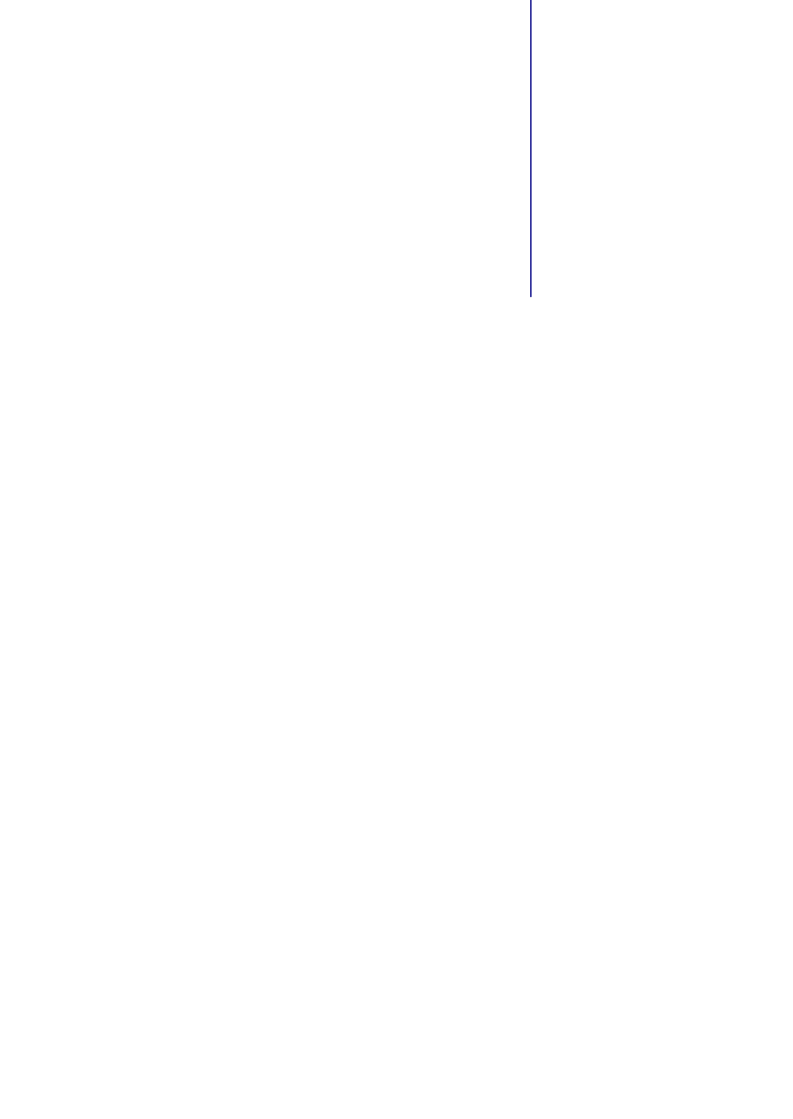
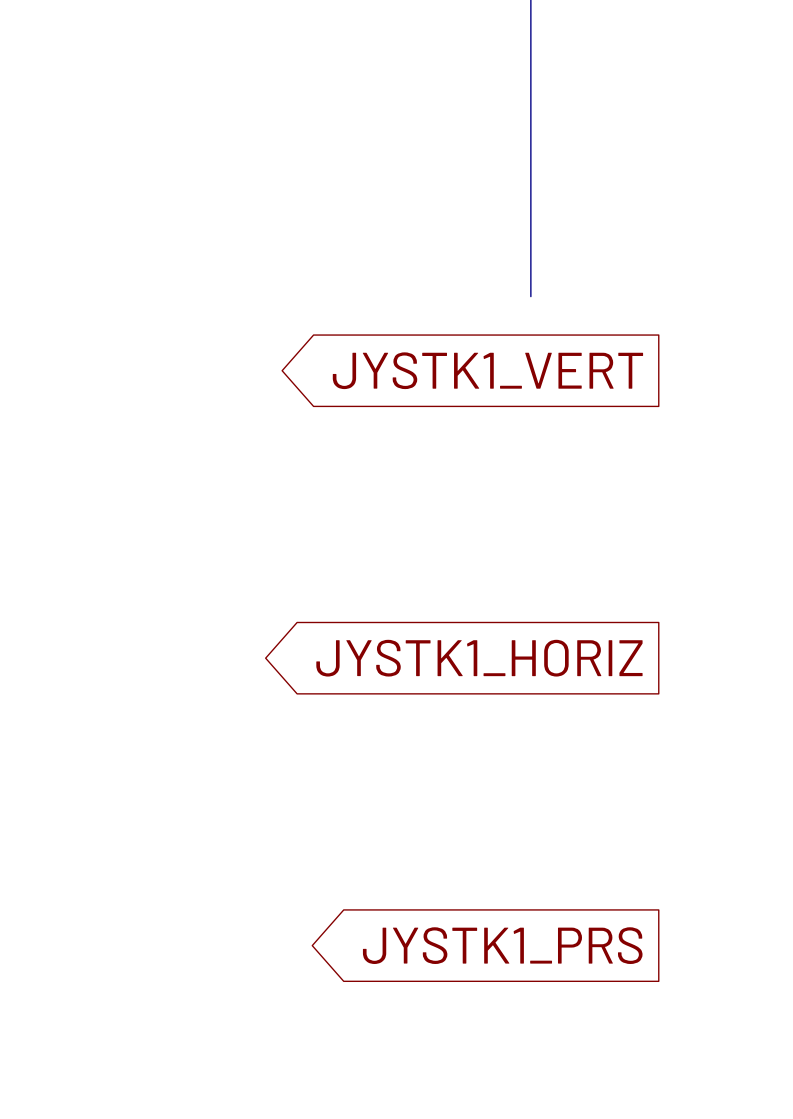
global label: none -> JYSTK1_VERT (487, 370)
global label: none -> JYSTK1_HORIZ (479, 658)
global label: none -> JYSTK1_PRS (502, 945)

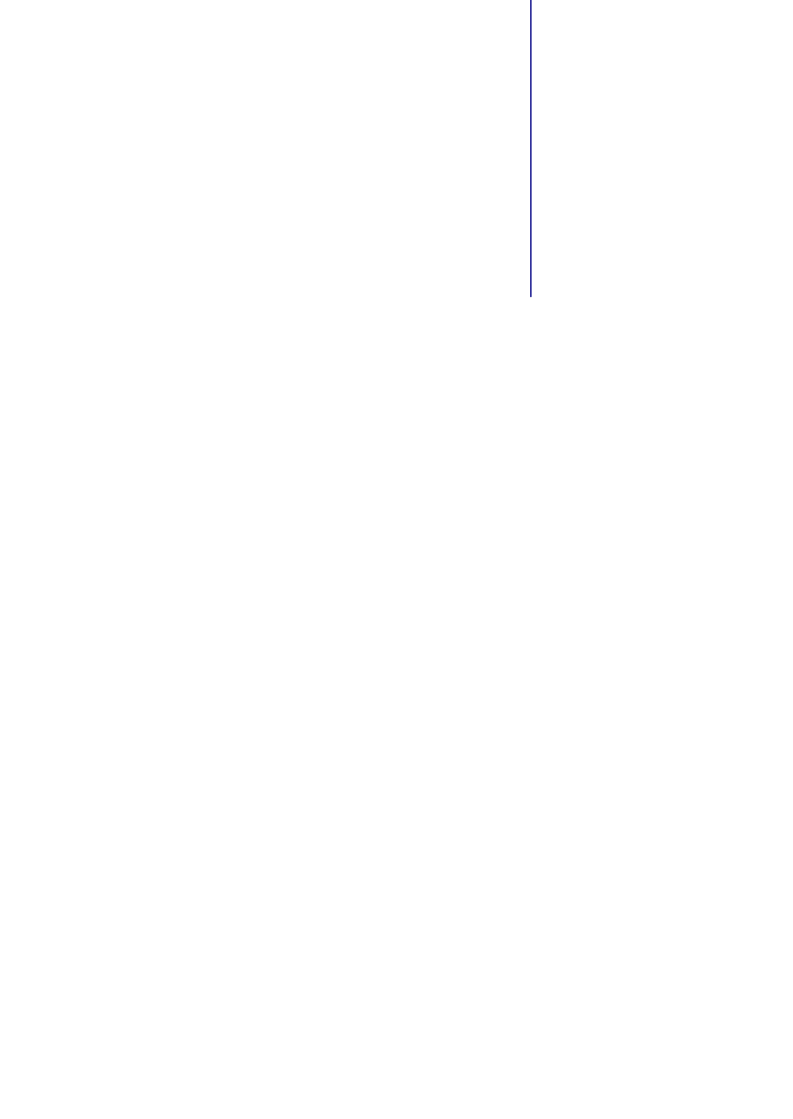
global label: JYSTK1_VERT (487, 370) -> none
global label: JYSTK1_HORIZ (479, 658) -> none
global label: JYSTK1_PRS (502, 945) -> none

